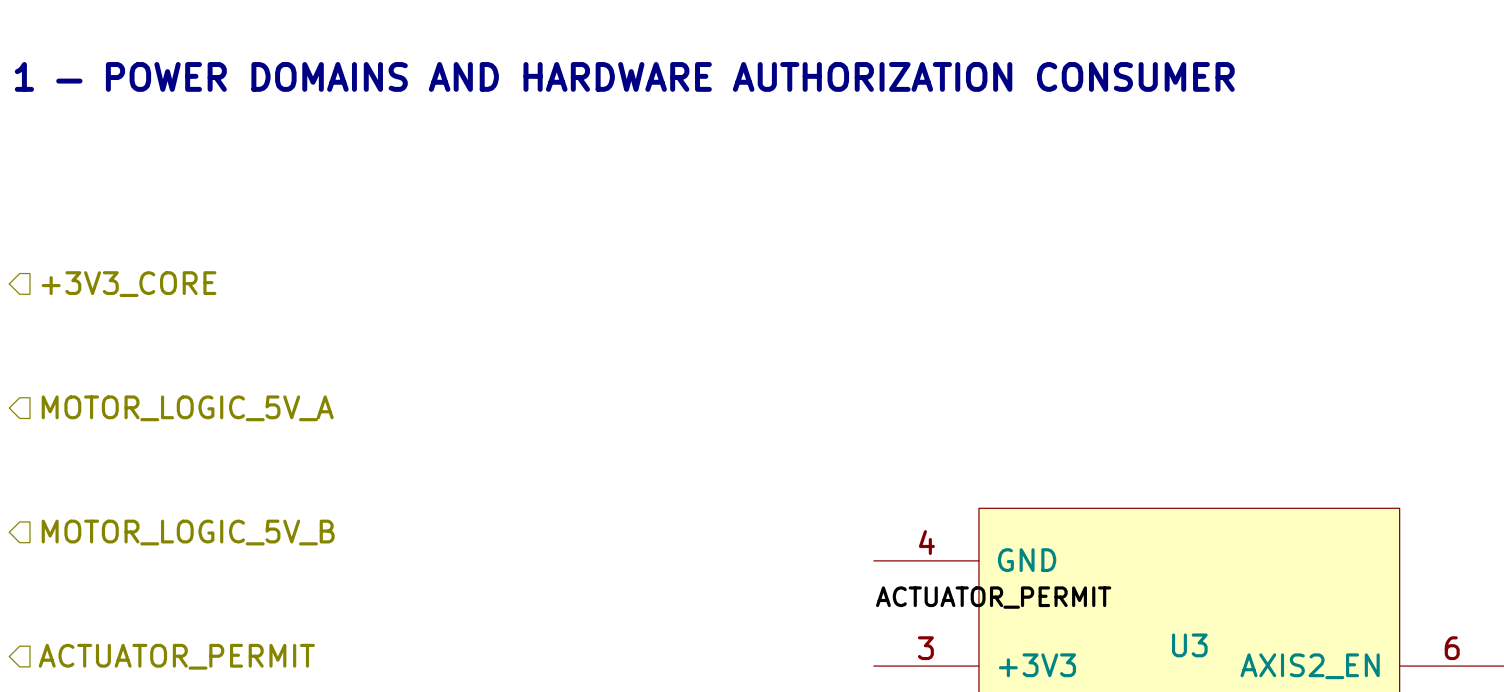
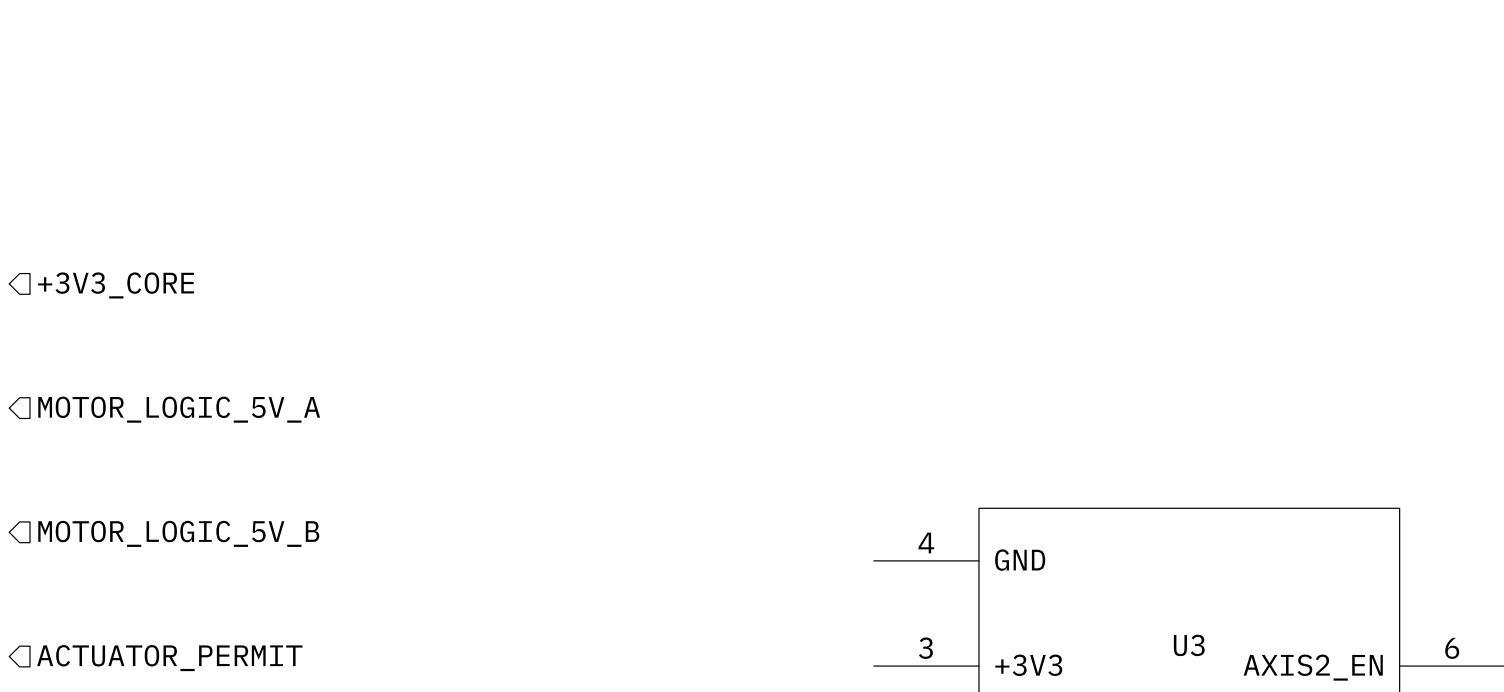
text: 1 — POWER DOMAINS AND HARDWARE AUTHORIZATION CONSUMER (624, 76) -> none
label: ACTUATOR_PERMIT (993, 597) -> none

